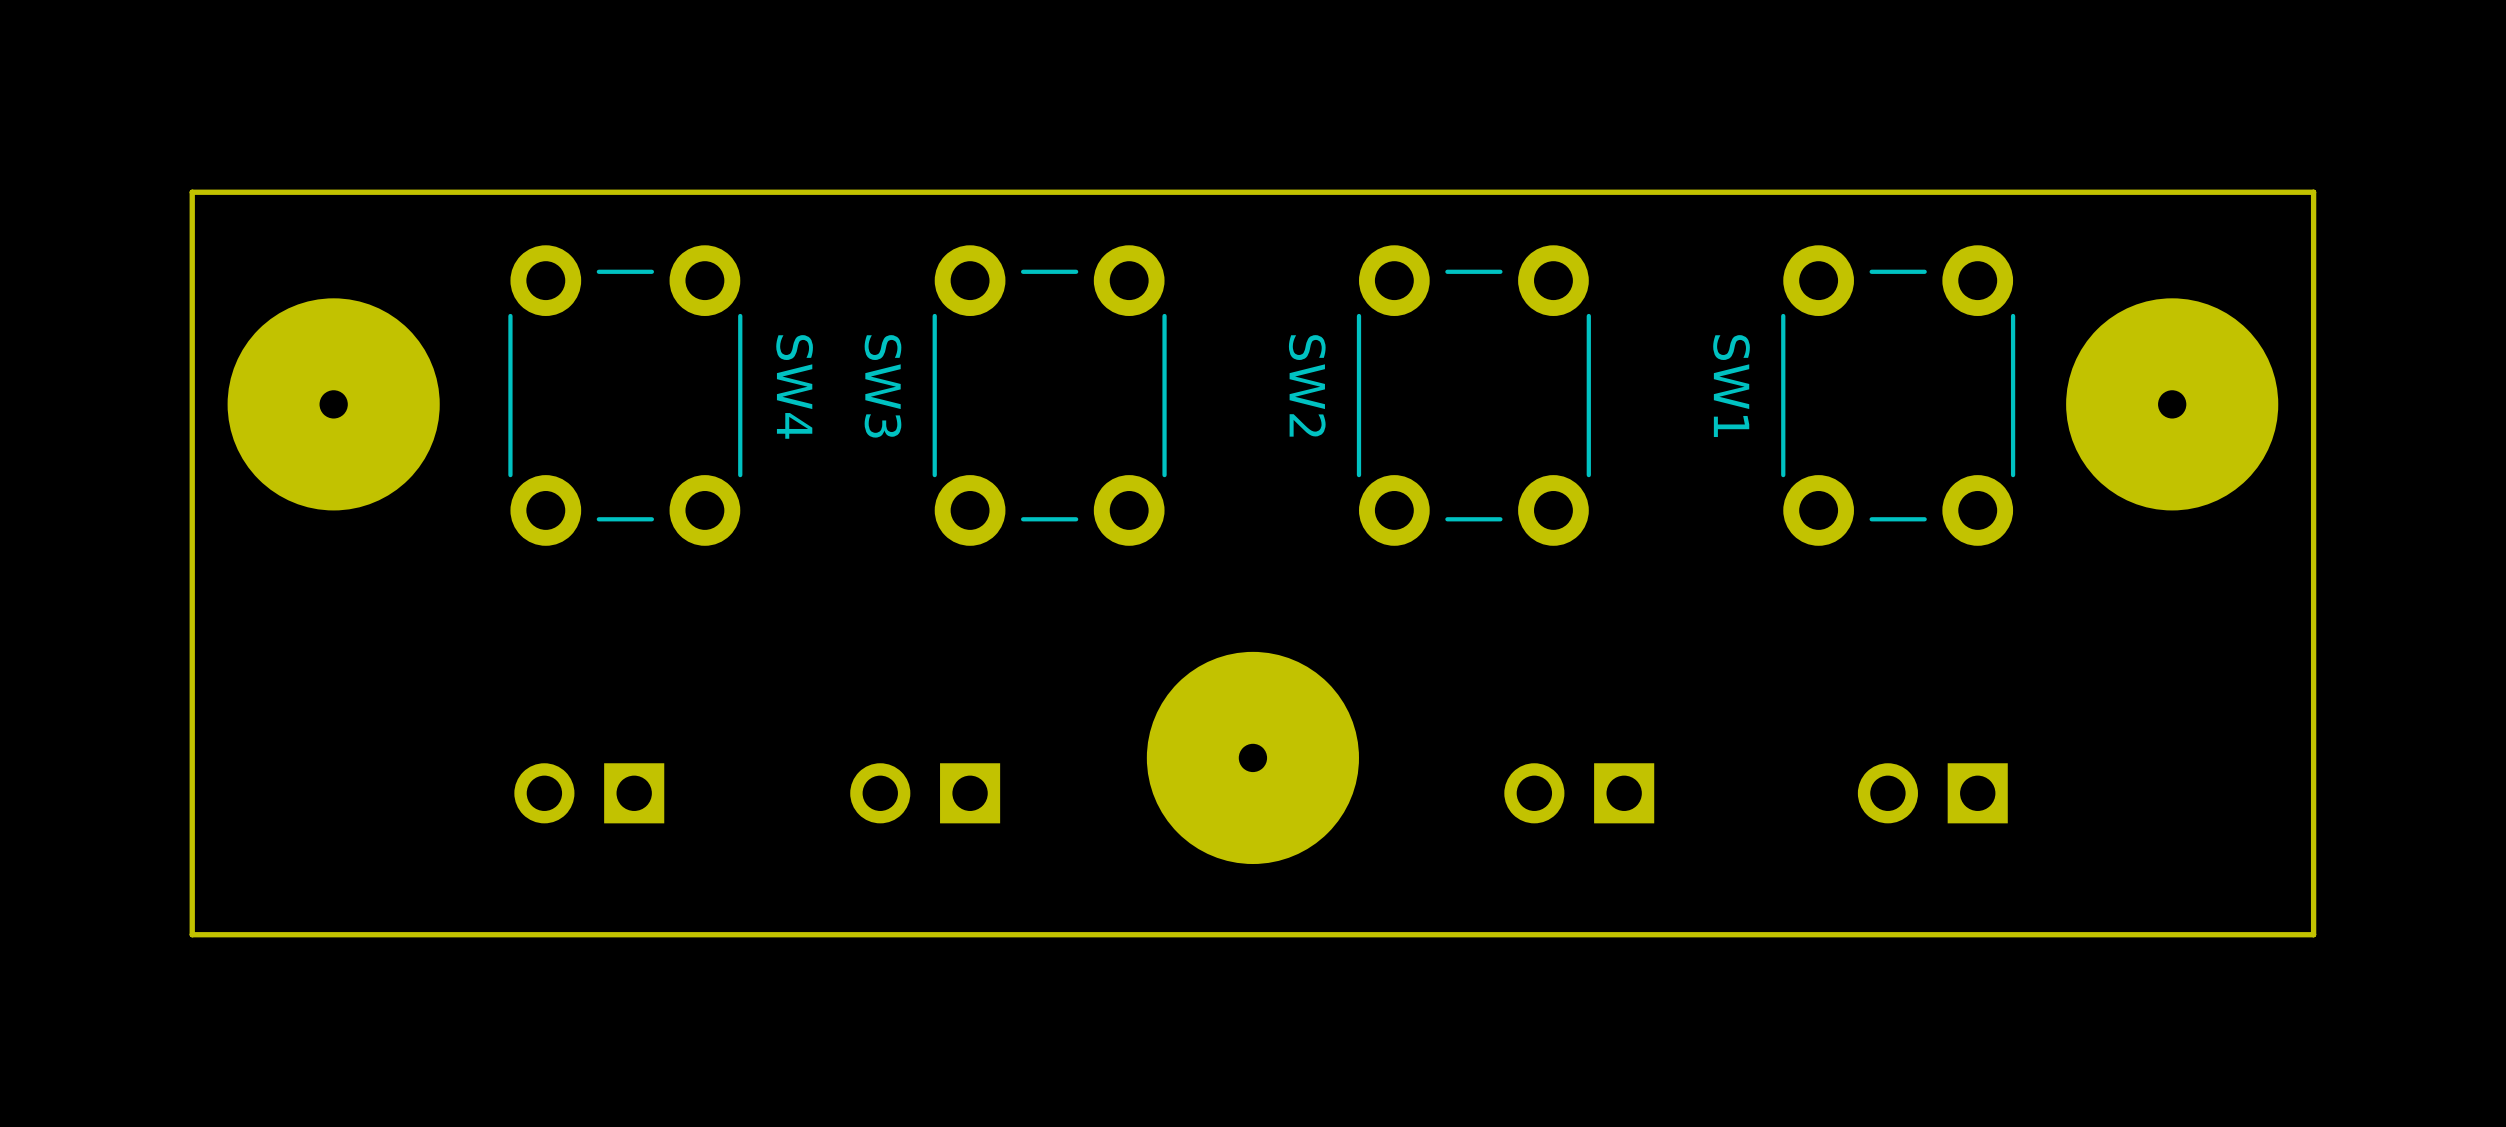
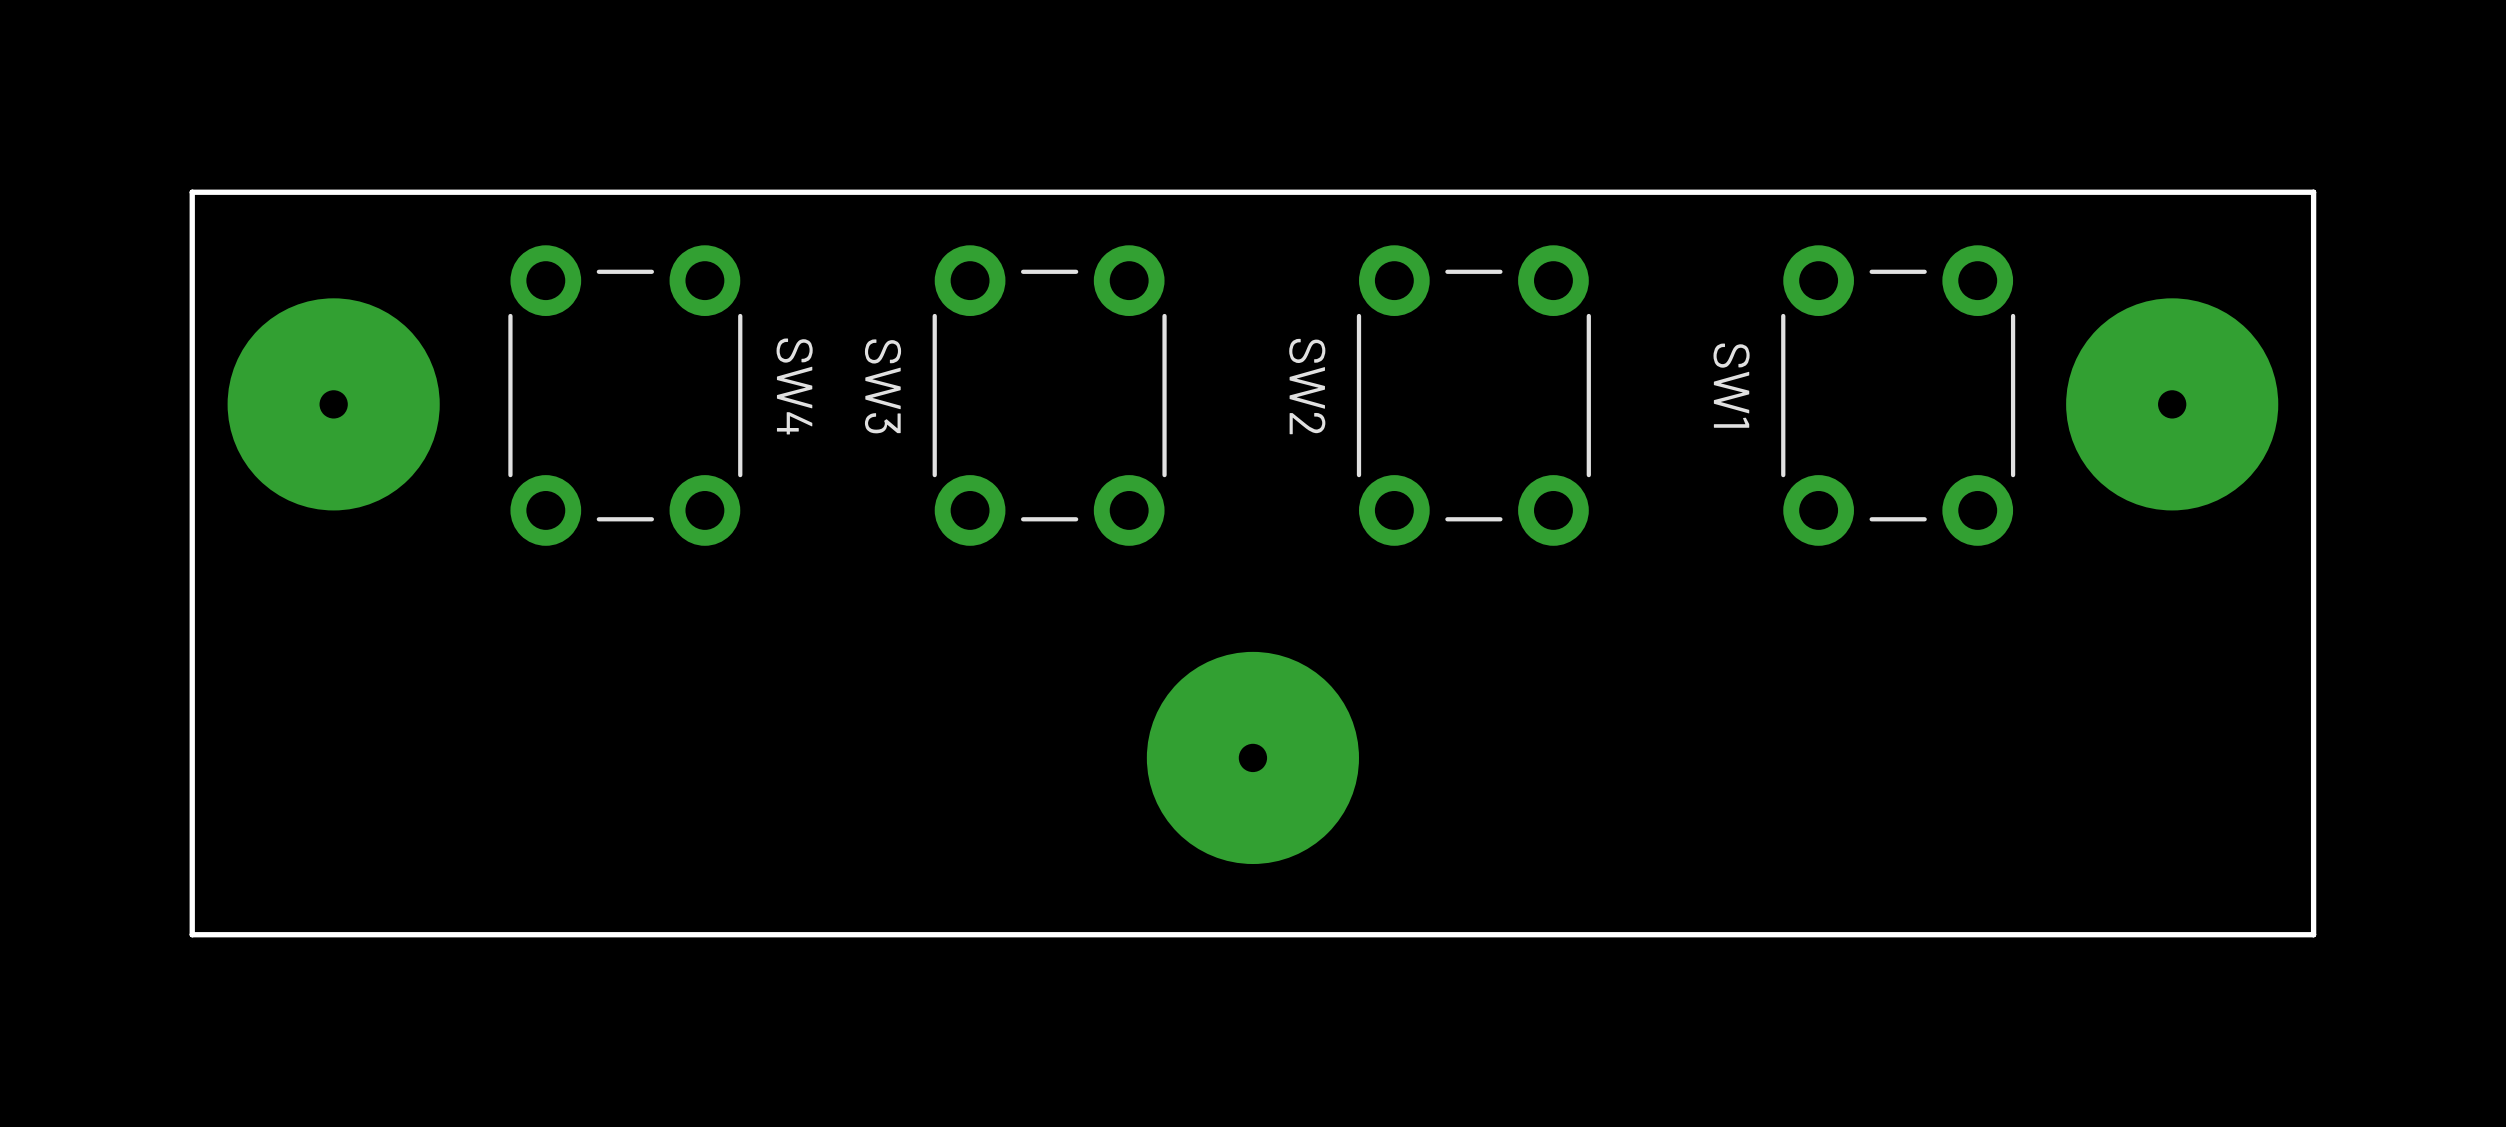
part: (589, 793) -> none
part: (925, 793) -> none
part: (1579, 793) -> none
part: (1932, 793) -> none

